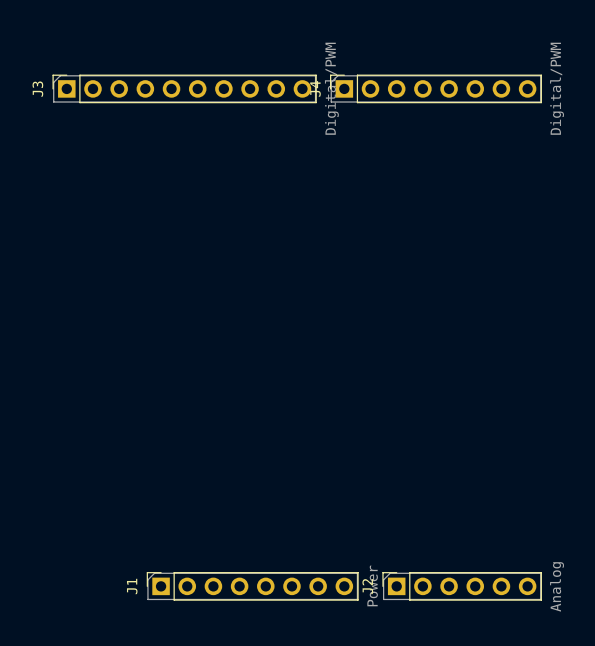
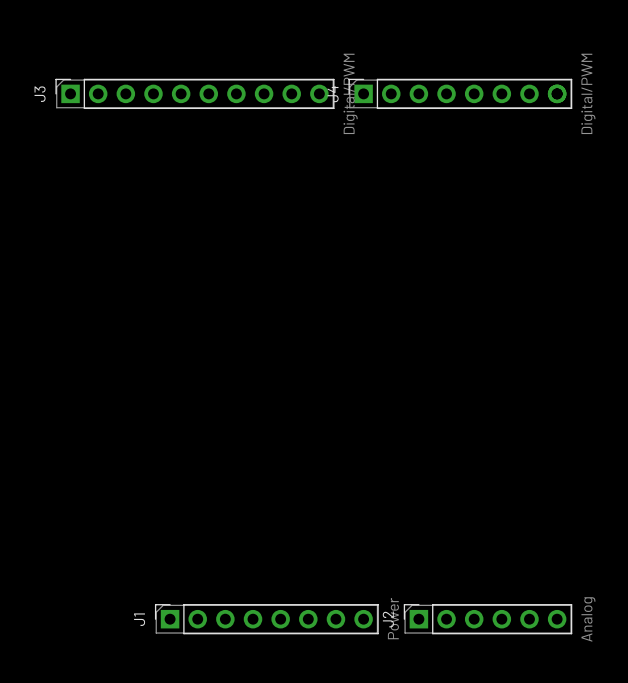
part: none -> (557, 93)

